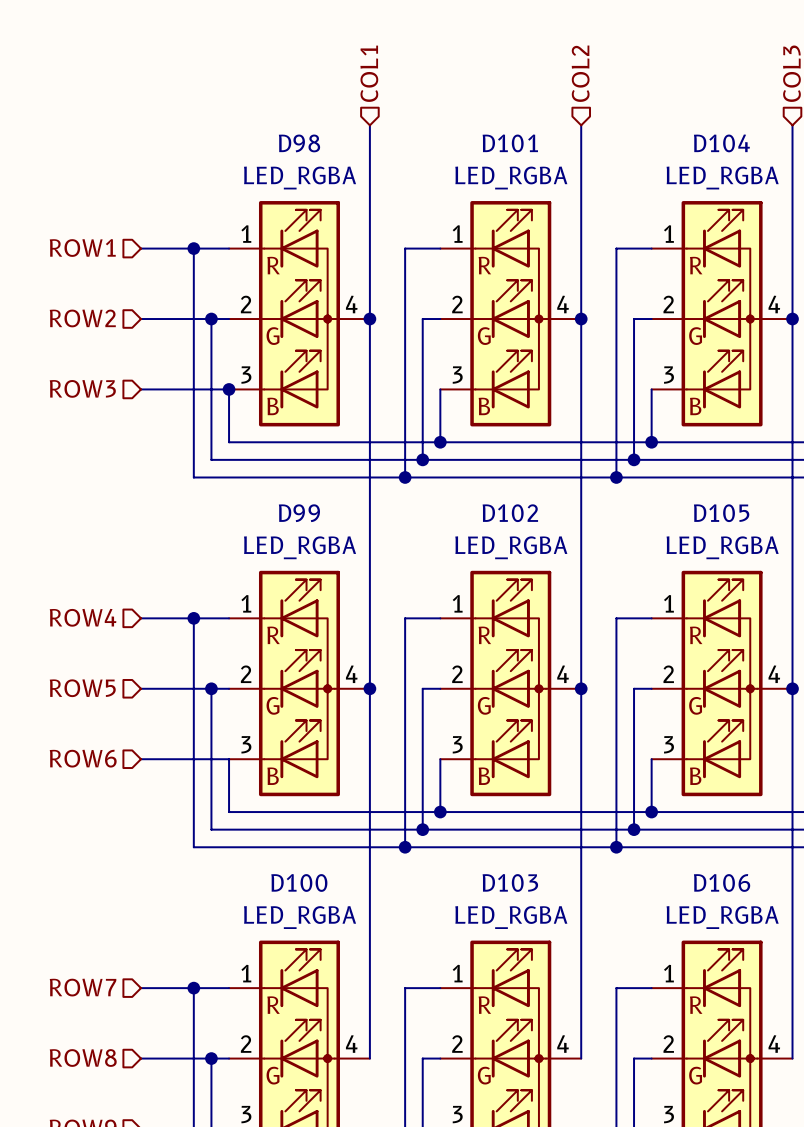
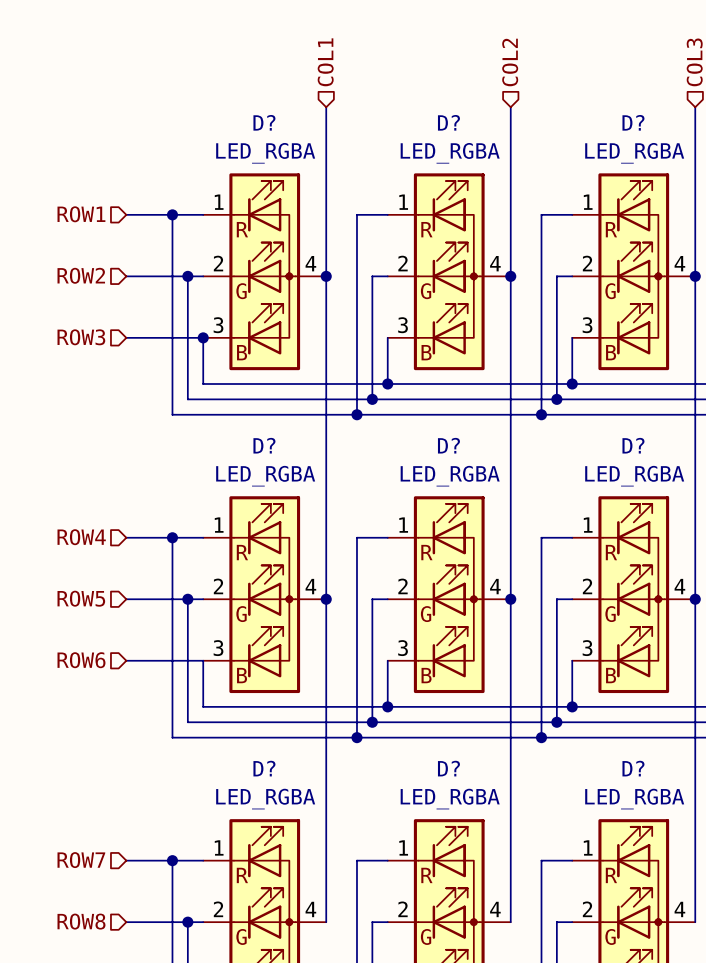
D98 name: D98 (299, 143) -> D? (264, 122)
D101 name: D101 (510, 143) -> D? (448, 122)
D104 name: D104 (721, 143) -> D? (633, 122)
D99 name: D99 (299, 513) -> D? (264, 445)
D102 name: D102 (510, 513) -> D? (448, 445)
D105 name: D105 (721, 513) -> D? (633, 445)
D100 name: D100 (299, 882) -> D? (264, 768)
D103 name: D103 (510, 882) -> D? (448, 768)
D106 name: D106 (722, 882) -> D? (633, 768)

